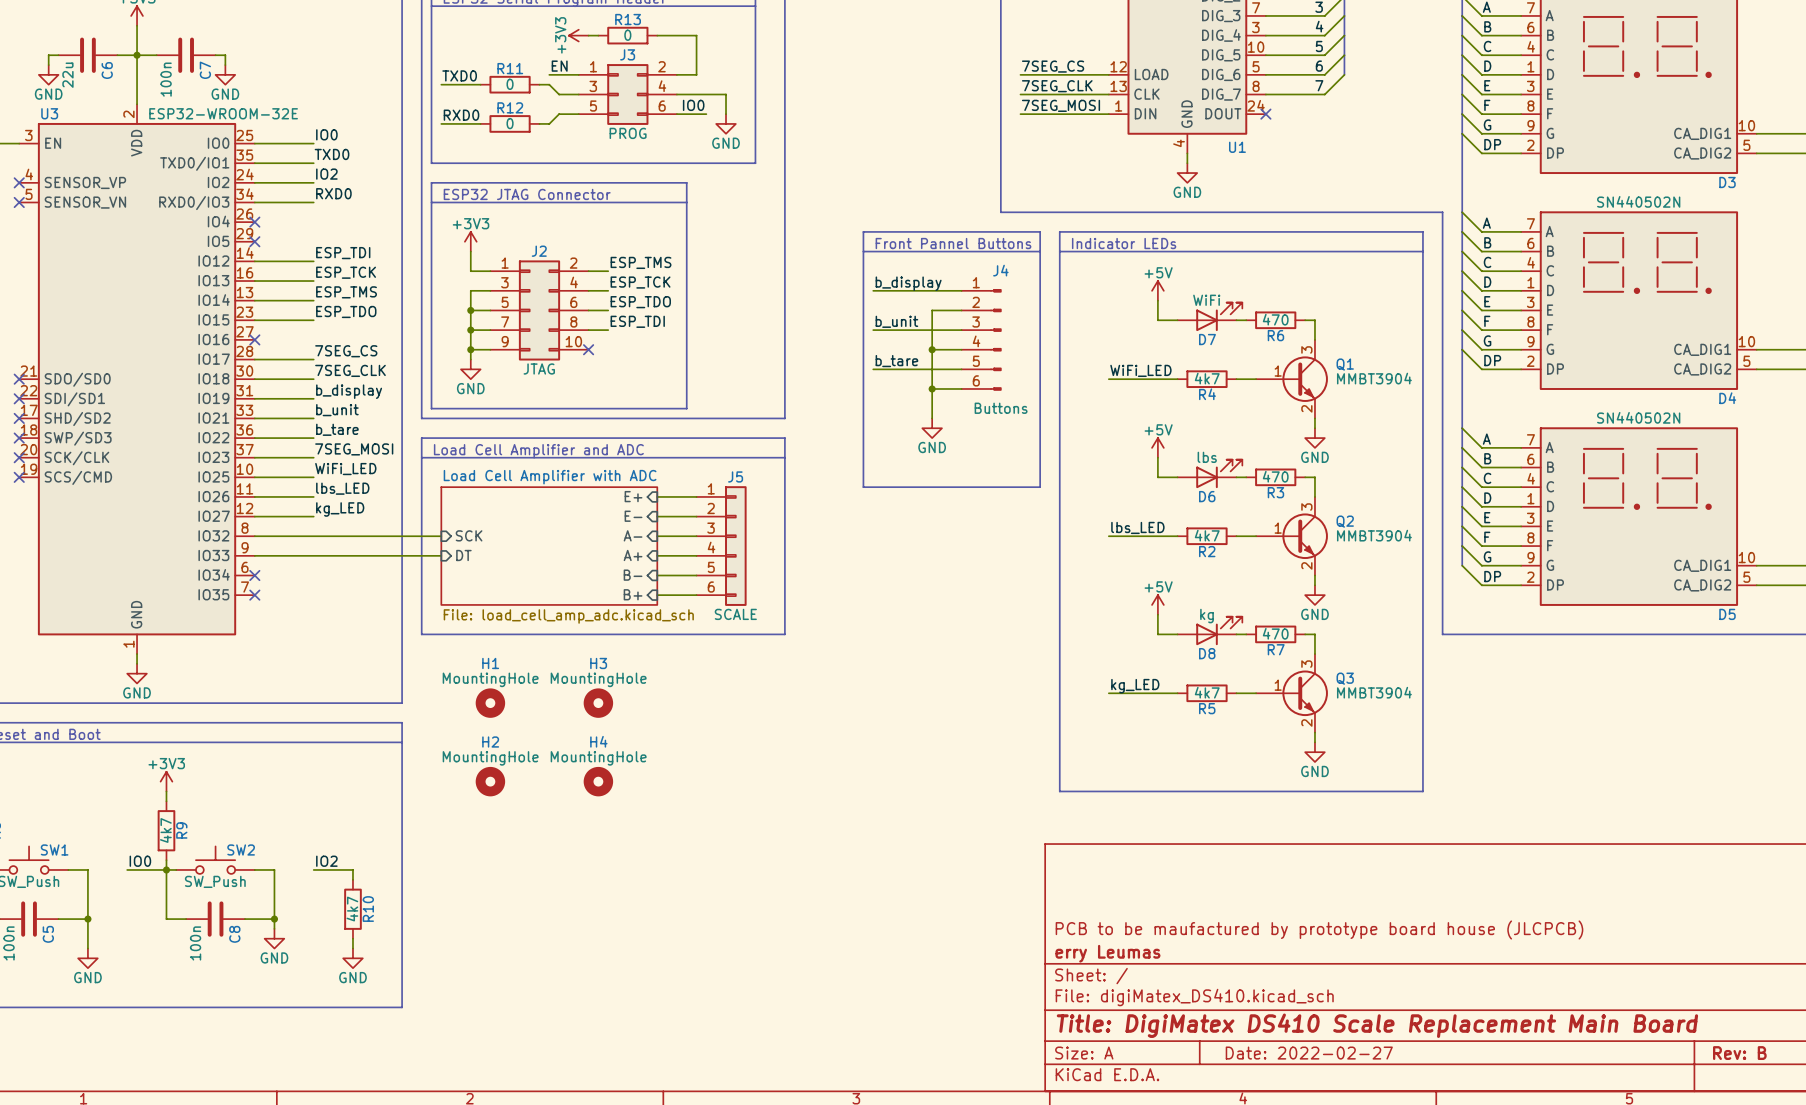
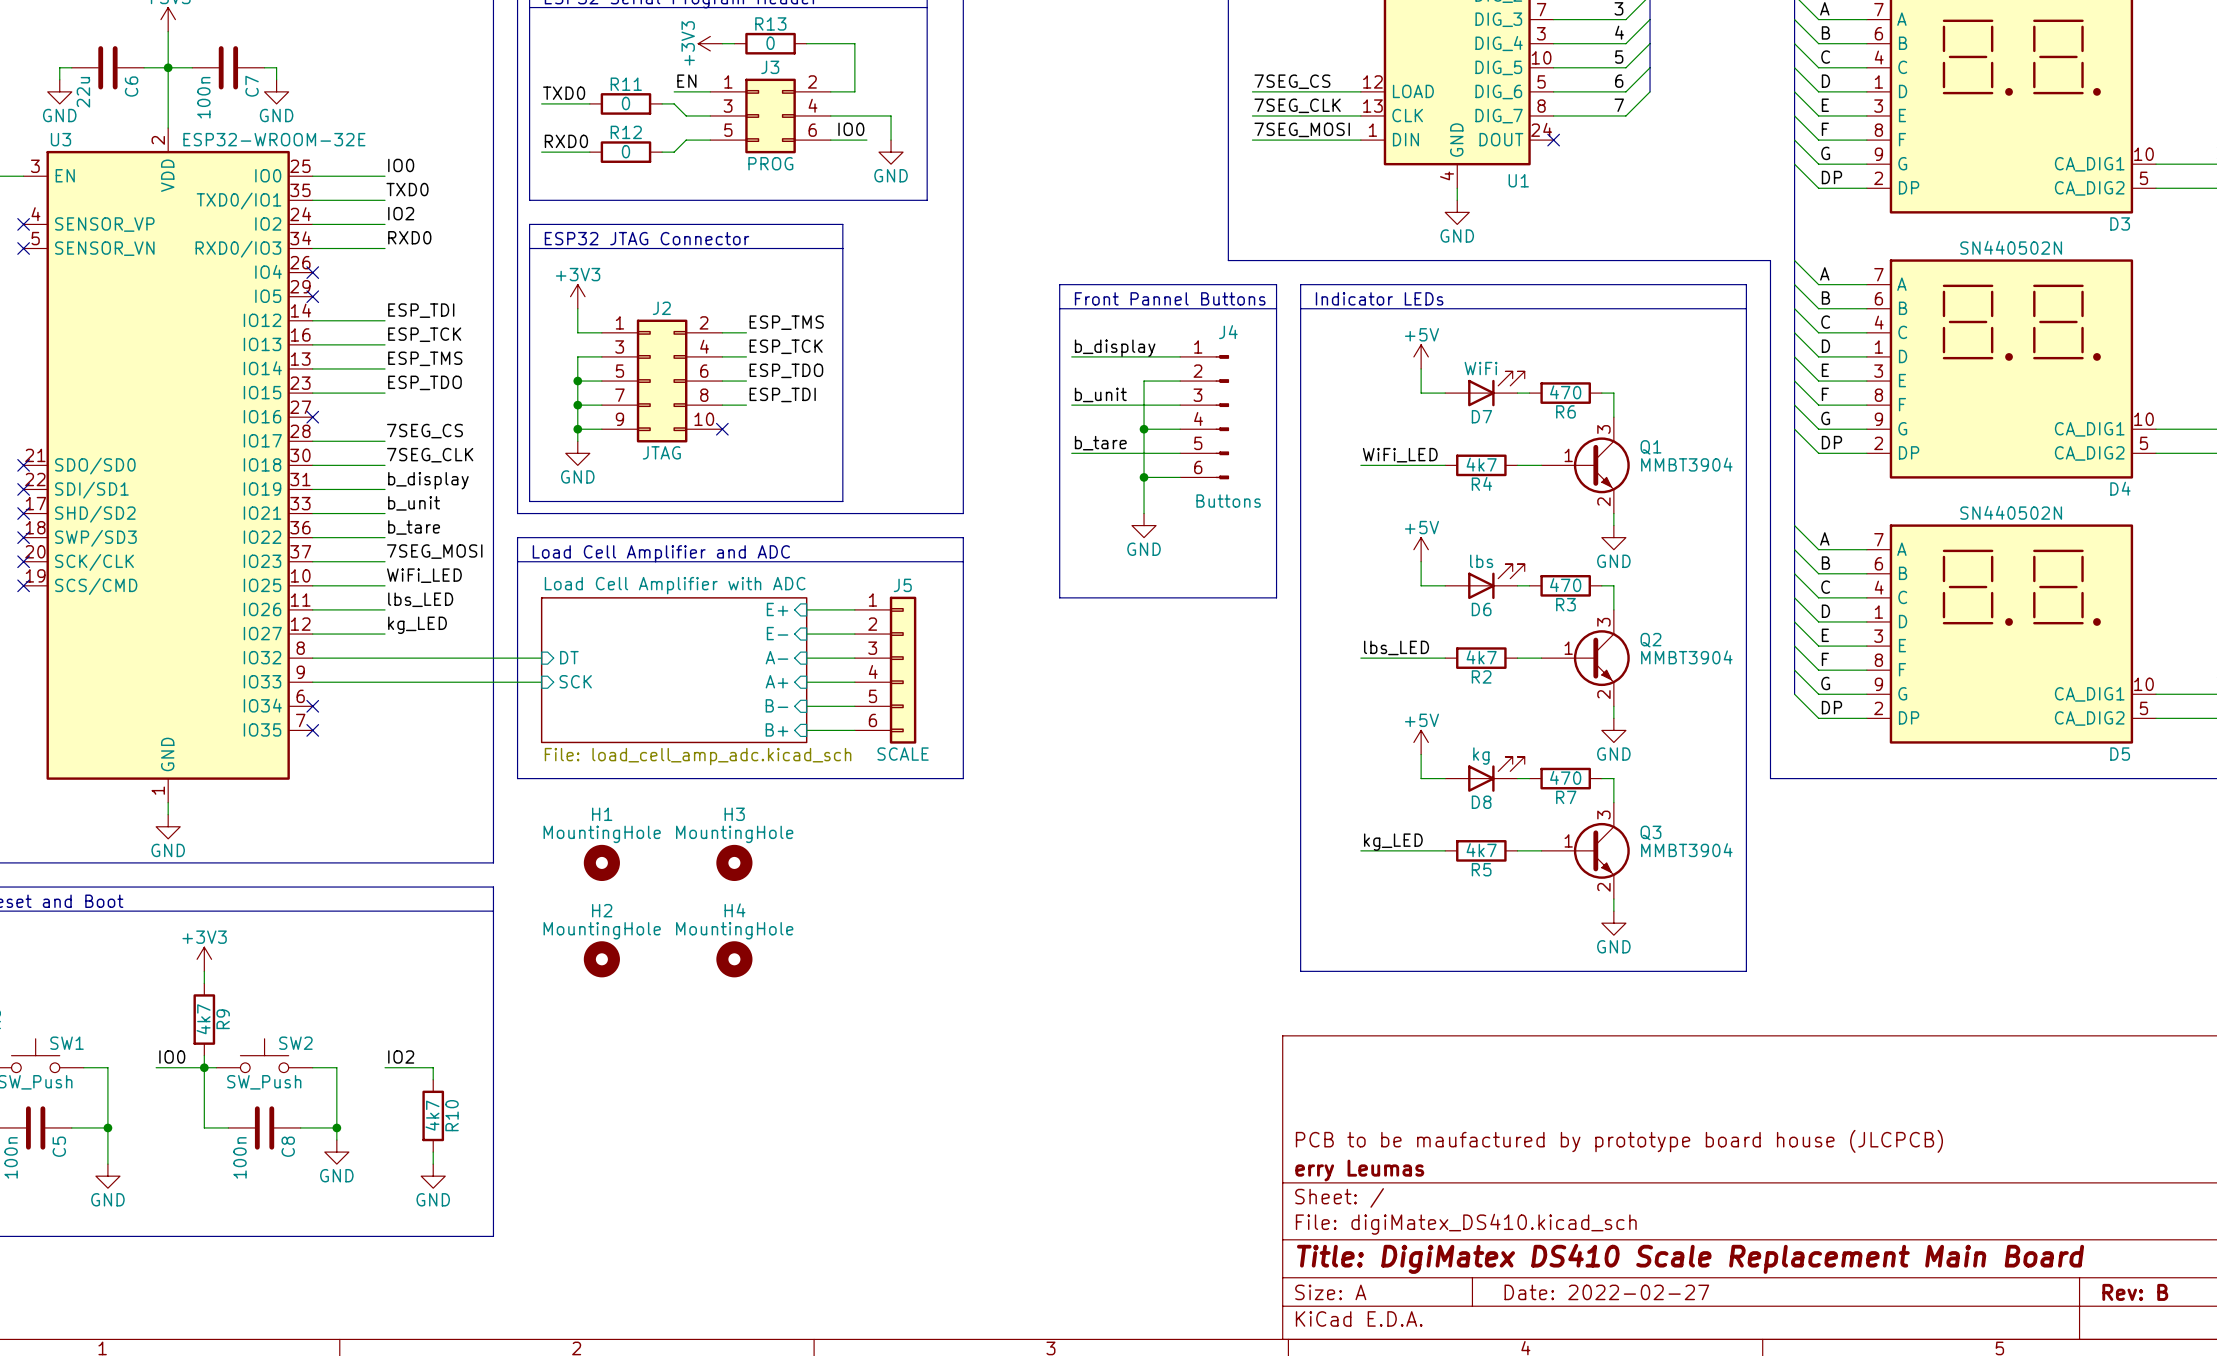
sheet pin: SCK (469, 535) -> DT (569, 657)
sheet pin: DT (463, 555) -> SCK (575, 681)

